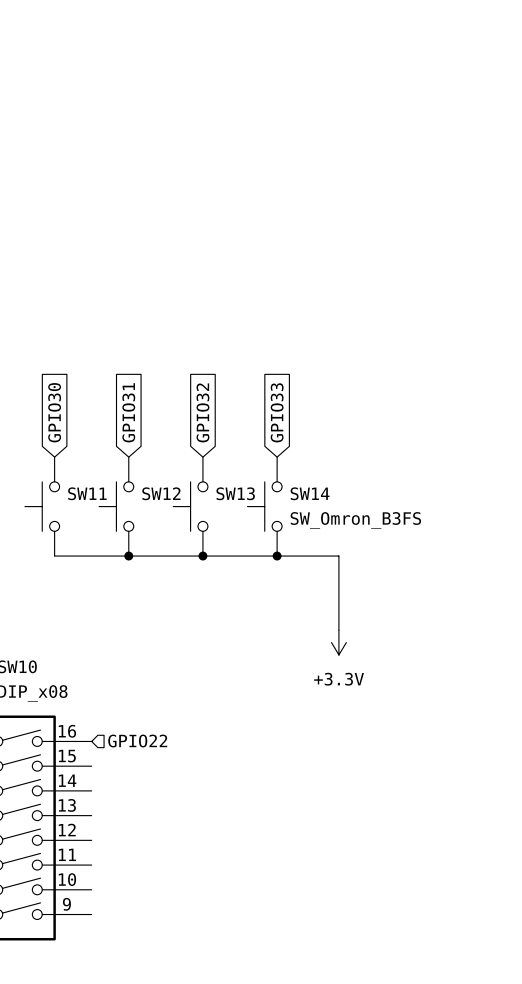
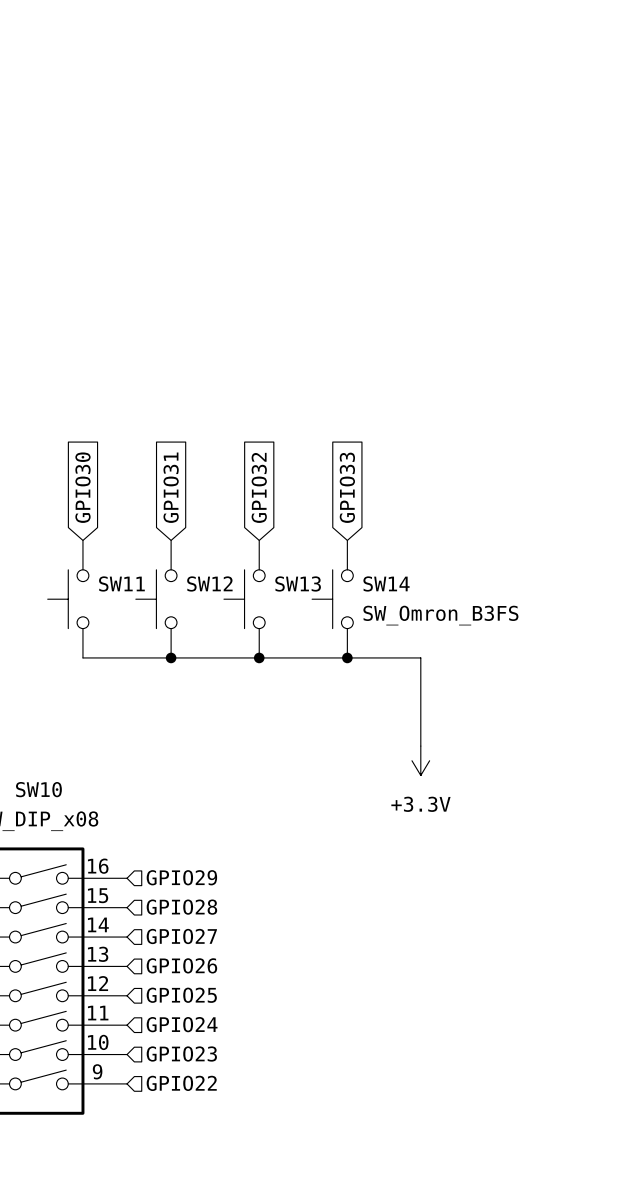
hierarchical label: GPIO22 (137, 741) -> GPIO29 (181, 877)
hierarchical label: none -> GPIO28 (181, 907)
hierarchical label: none -> GPIO27 (181, 936)
hierarchical label: none -> GPIO26 (181, 965)
hierarchical label: none -> GPIO25 (181, 995)
hierarchical label: none -> GPIO24 (182, 1024)
hierarchical label: none -> GPIO23 (181, 1054)
hierarchical label: none -> GPIO22 (181, 1083)

